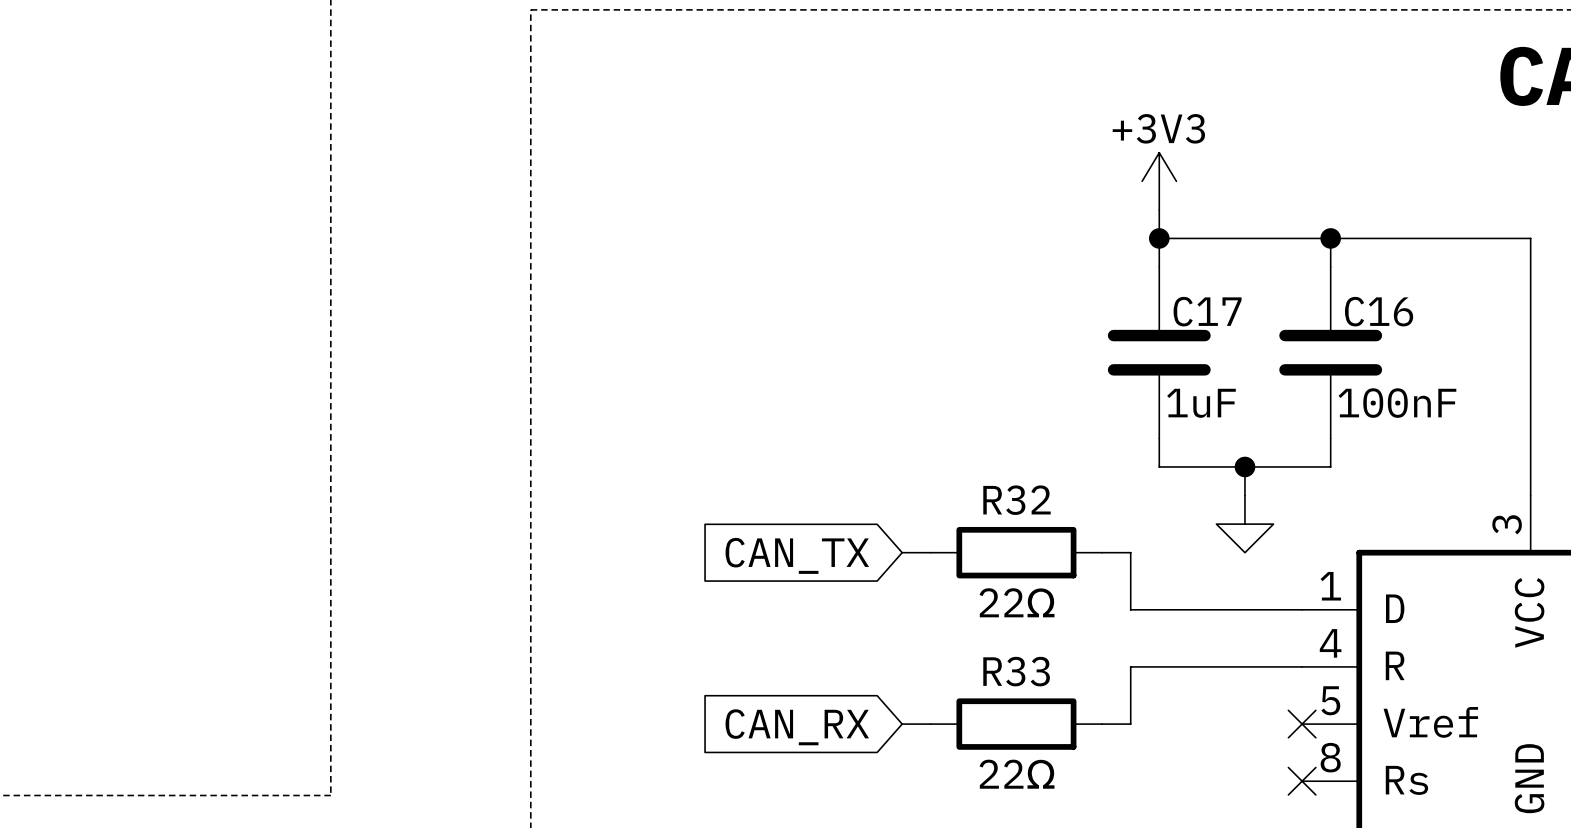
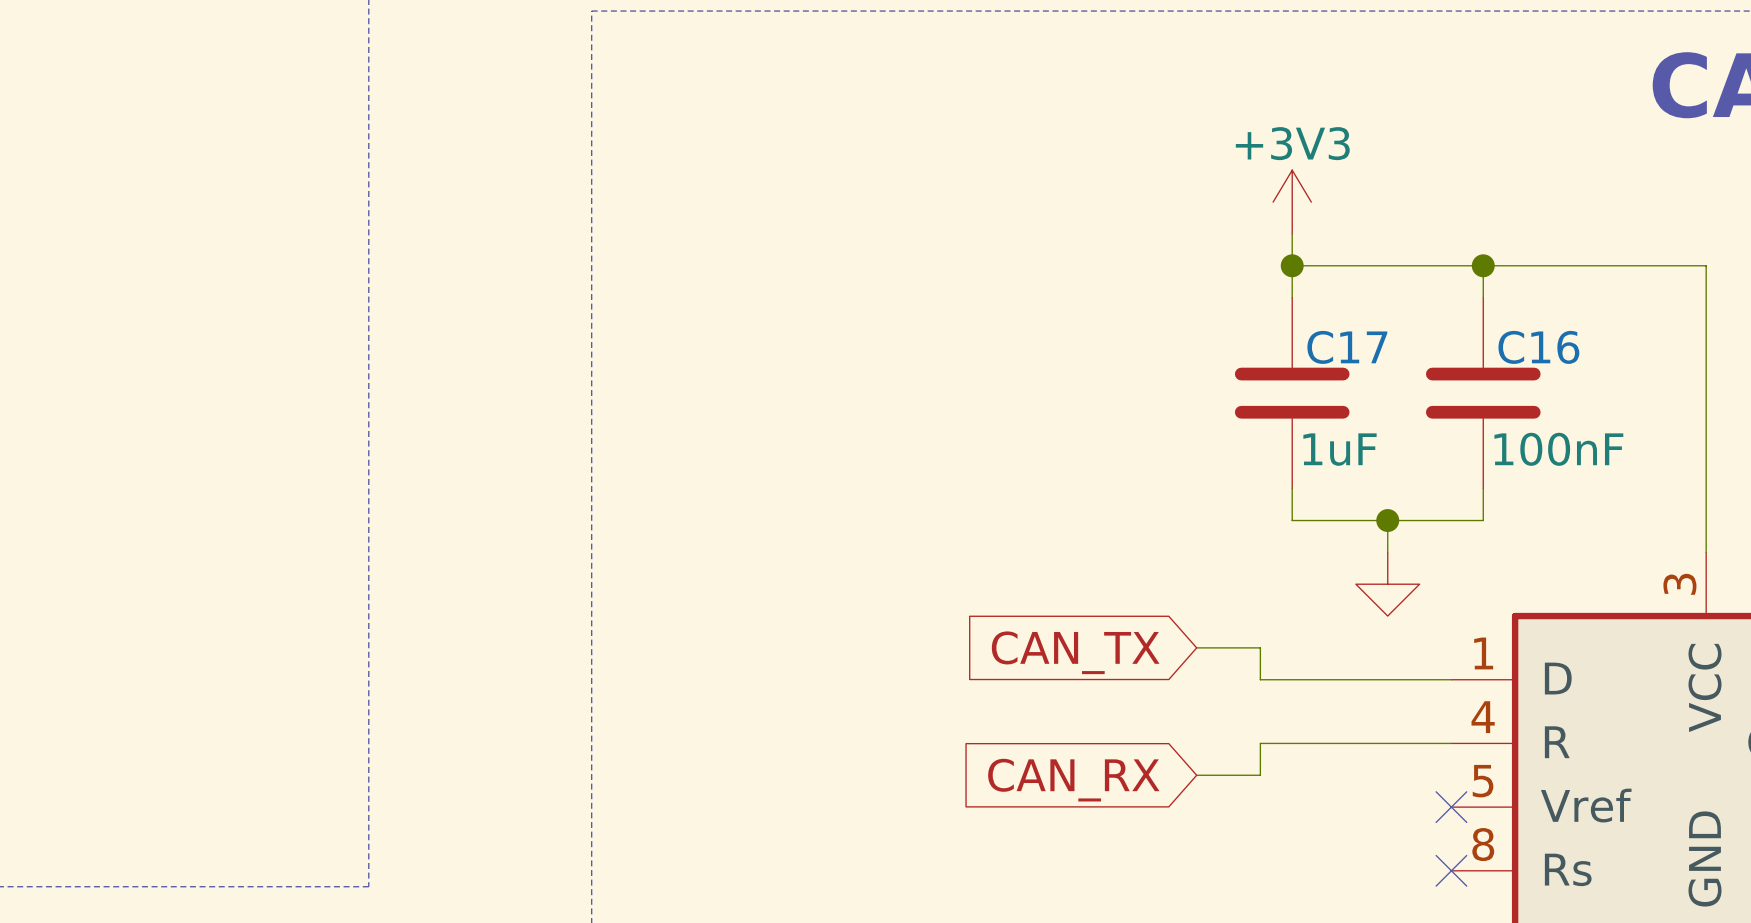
R32: 22Ω (1016, 552) -> none
wire: (1102, 552) (1130, 552) (1130, 581) -> (1196, 647) (1260, 647)
global label position: CAN_TX (797, 555) -> CAN_TX (1075, 652)
wire: (1130, 695) (1130, 724) (1102, 724) -> (1260, 775) (1196, 775)
R33: 22Ω (1016, 724) -> none
global label position: CAN_RX (797, 727) -> CAN_RX (1073, 780)

